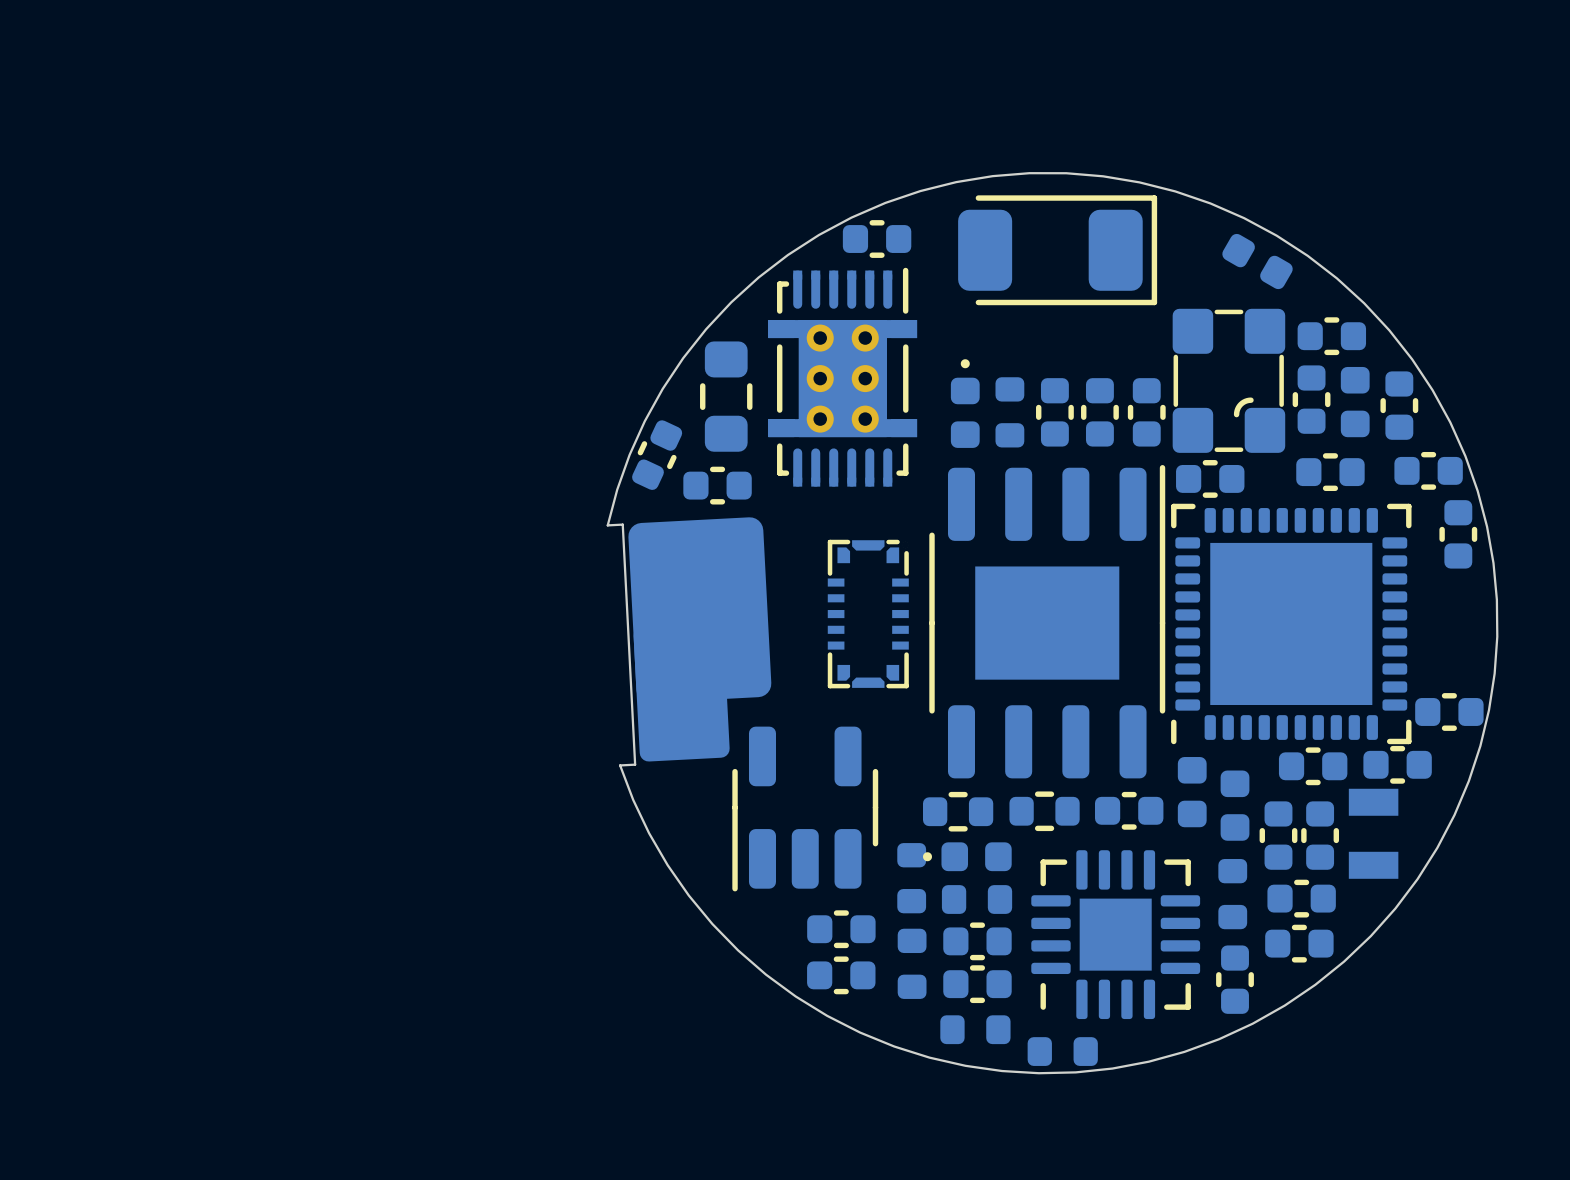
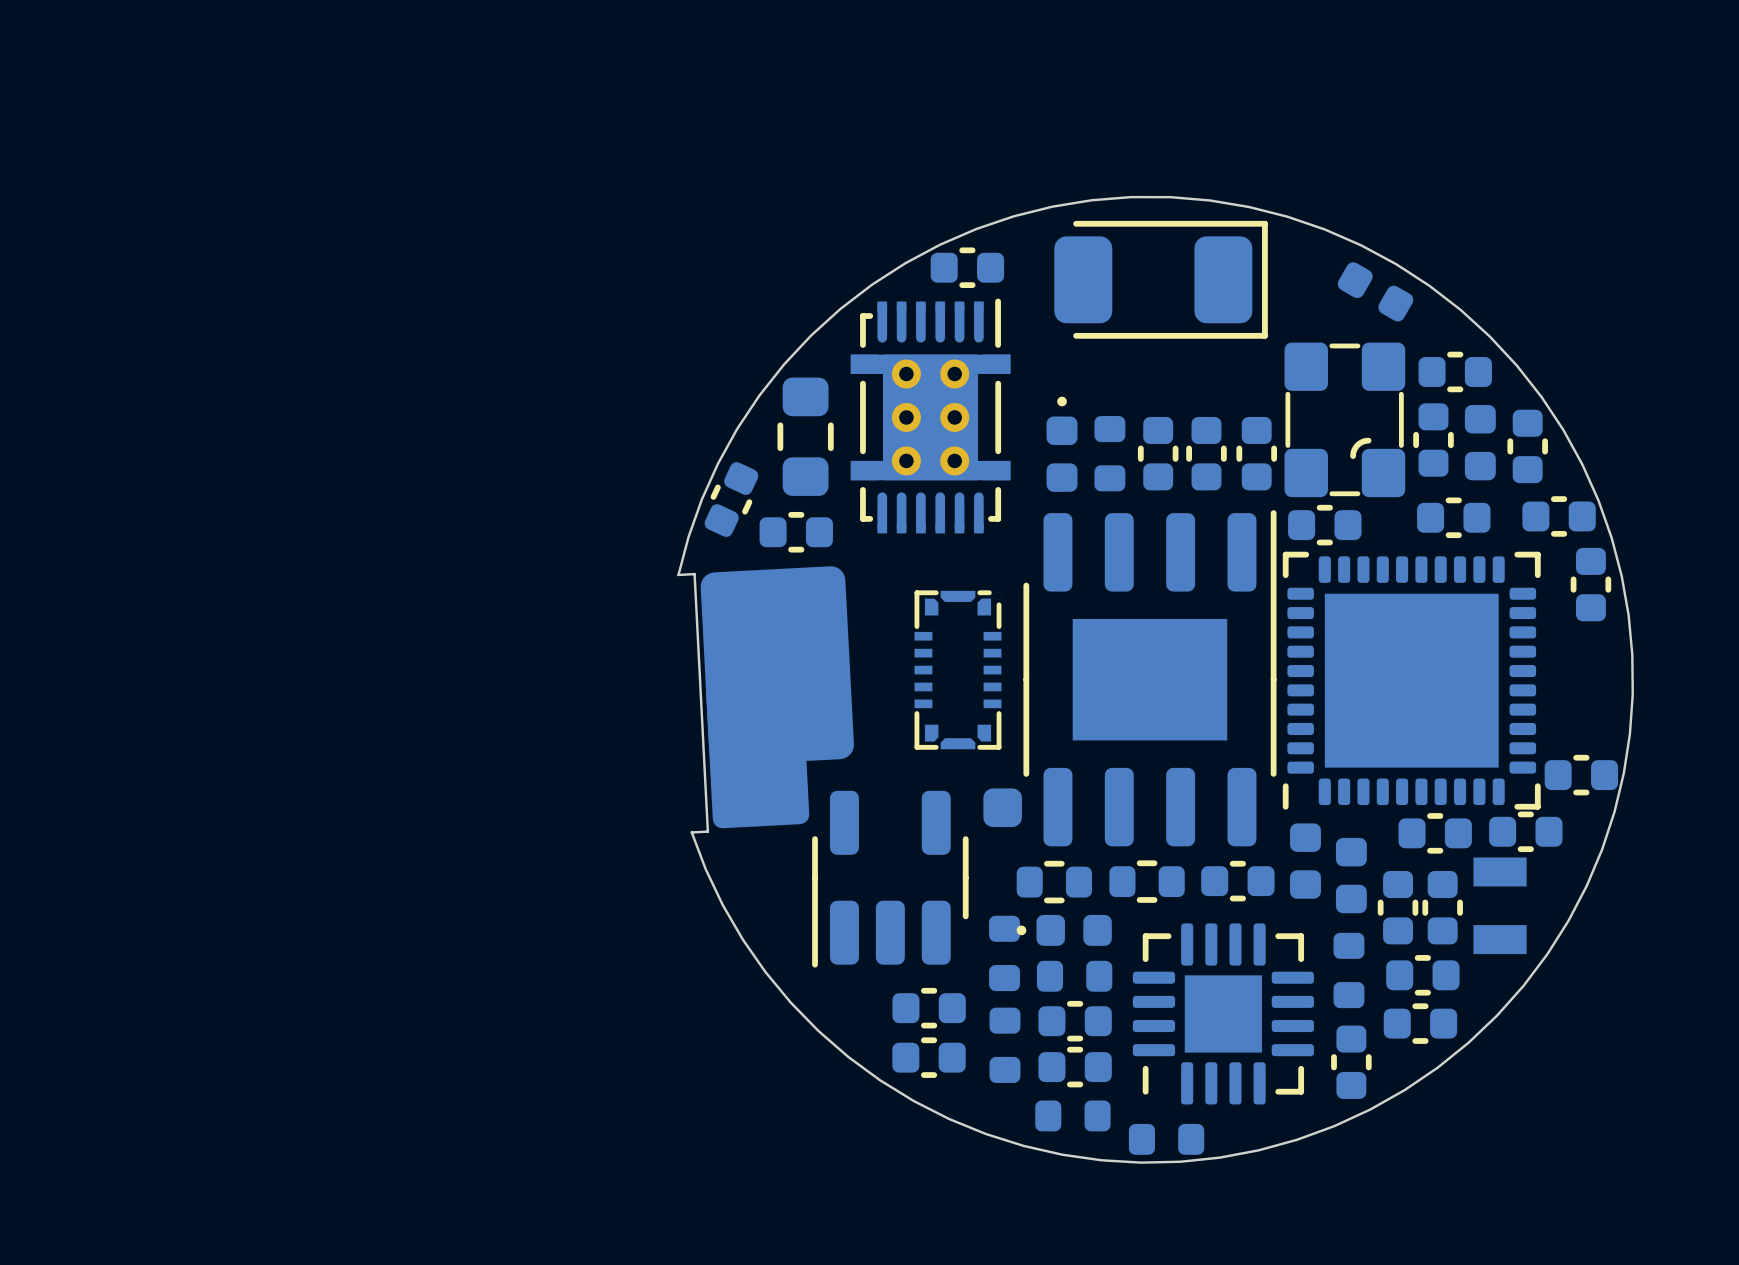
part: none -> (1002, 807)

